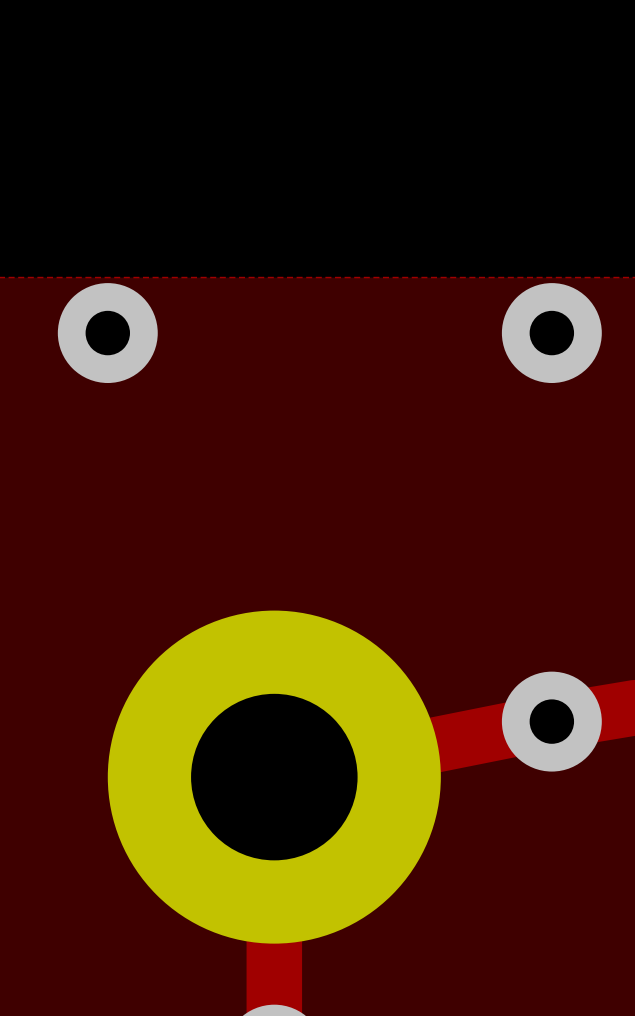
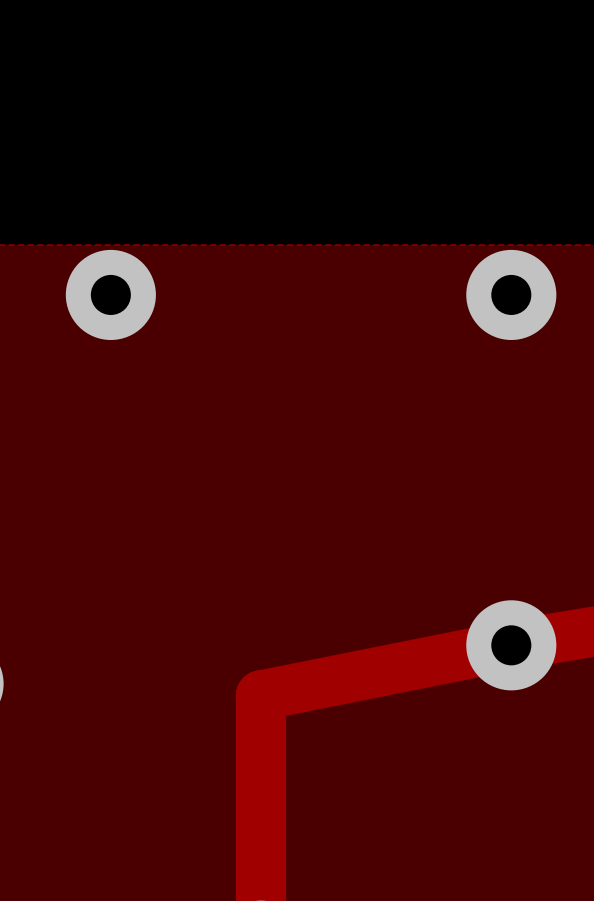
part: (274, 777) -> none

